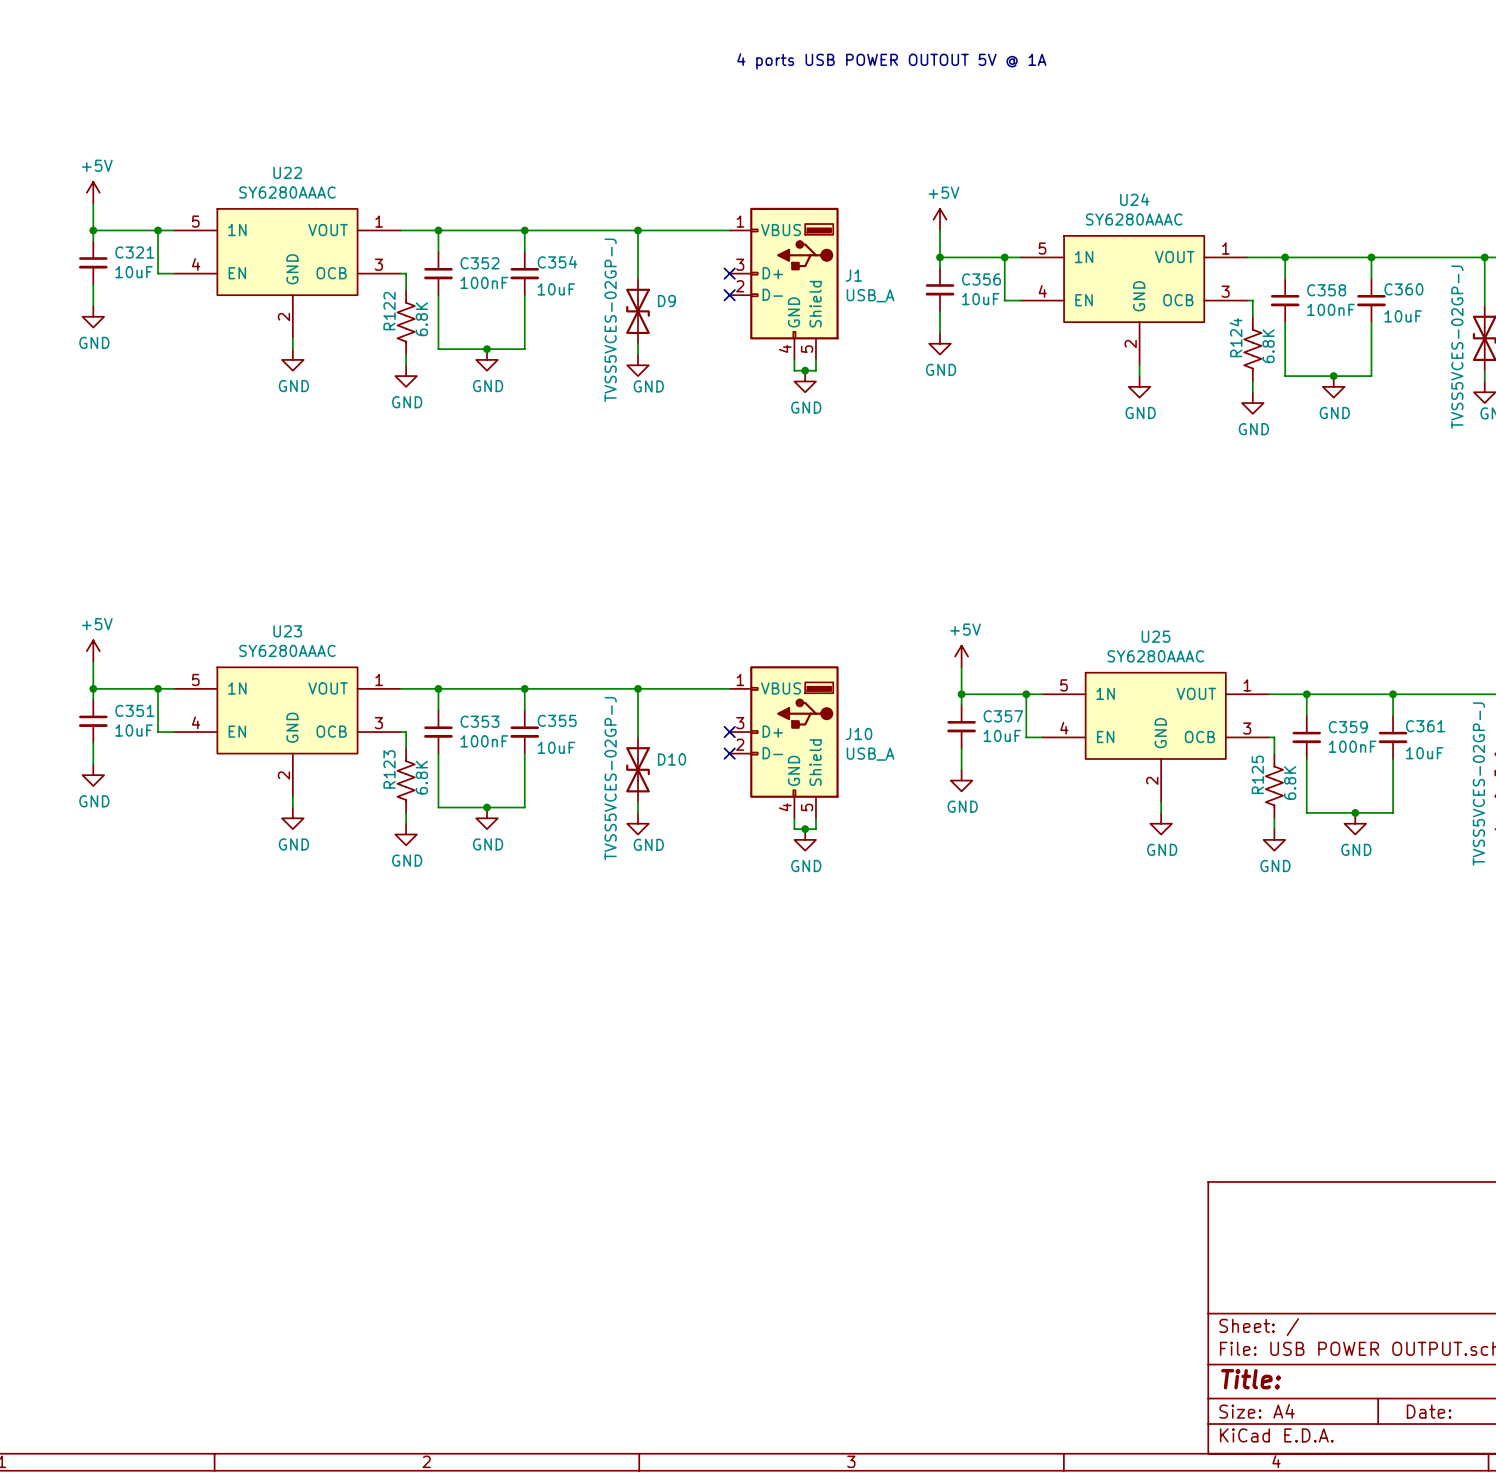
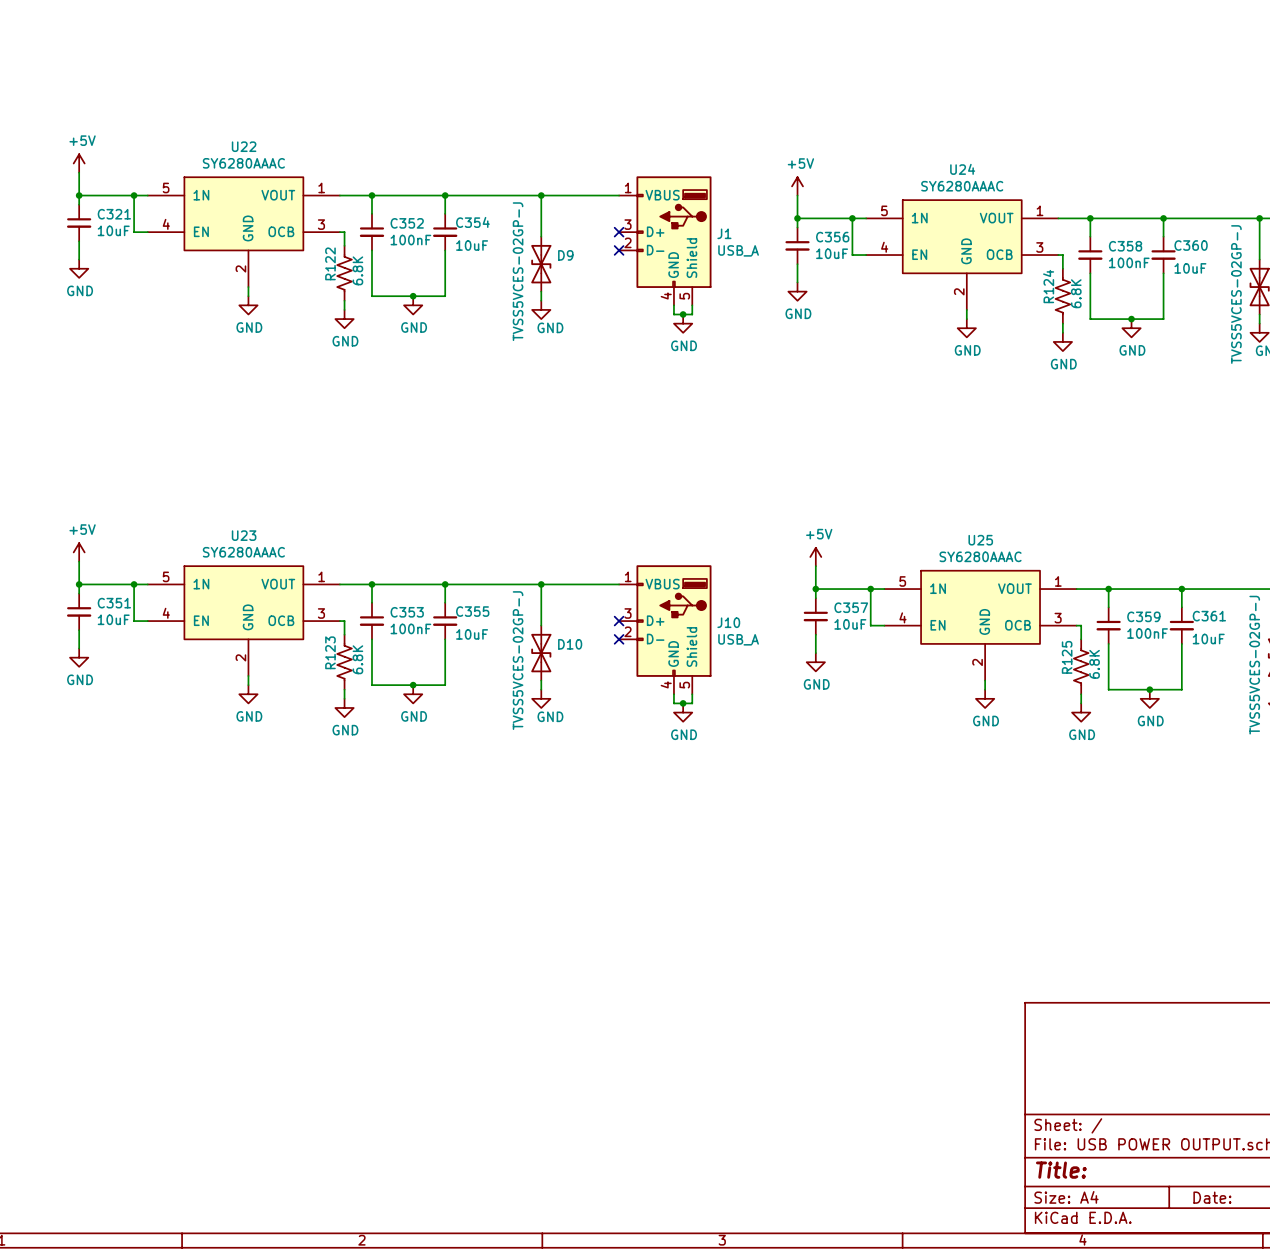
text: 4 ports USB POWER OUTOUT 5V @ 1A (891, 61) -> none

